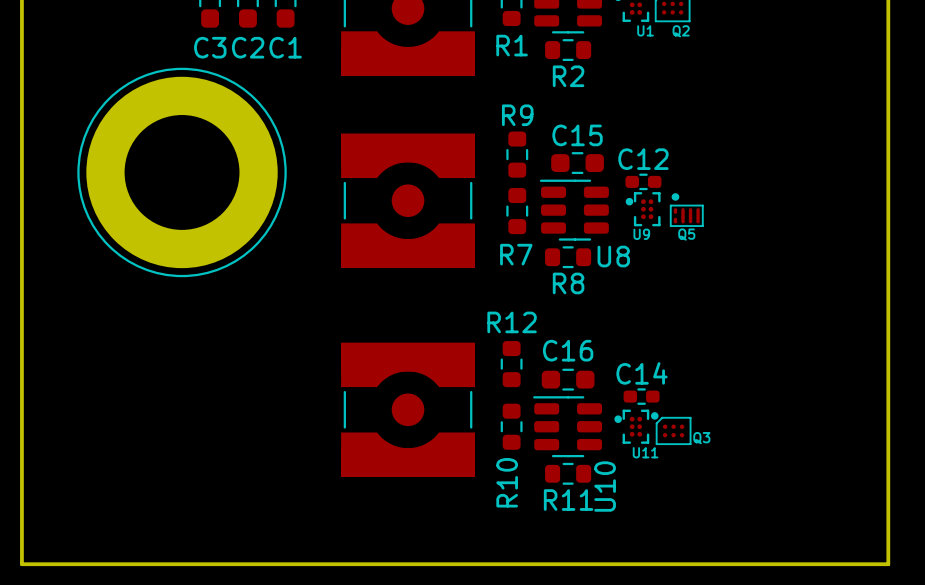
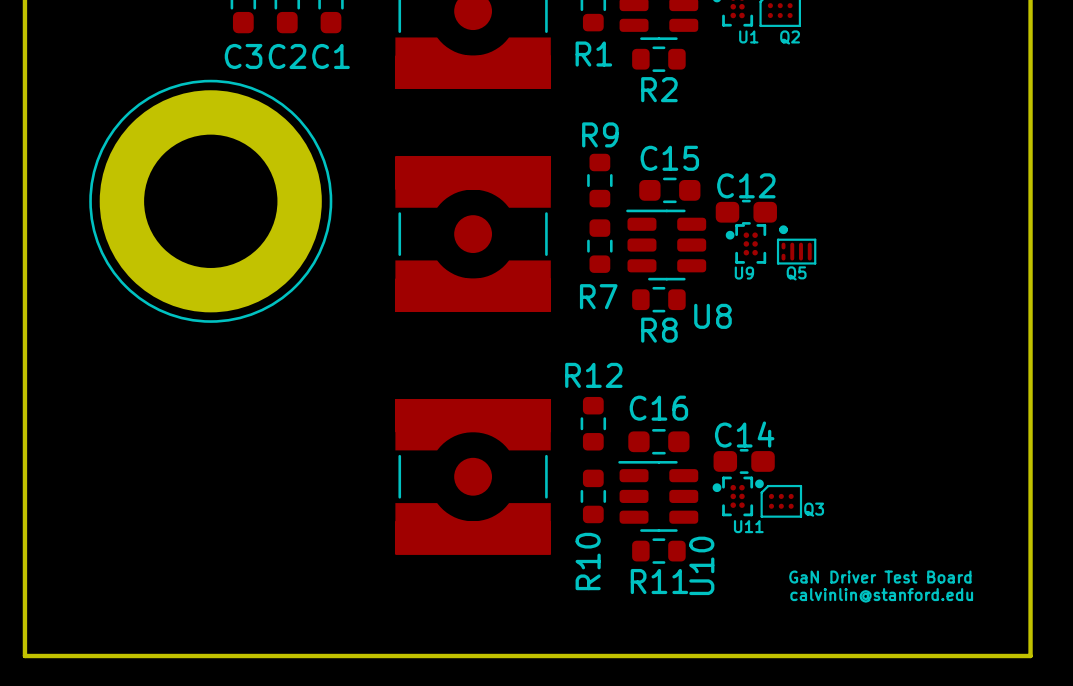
C12 footprint: [625, 173, 662, 191] -> [715, 199, 777, 225]
U8 name position: U8 (613, 256) -> U8 (712, 316)
C14 footprint: [623, 388, 660, 405] -> [713, 448, 775, 474]
text: none -> GaN Driver Test Board (880, 577)
text: none -> calvinlin@stanford.edu (881, 595)

